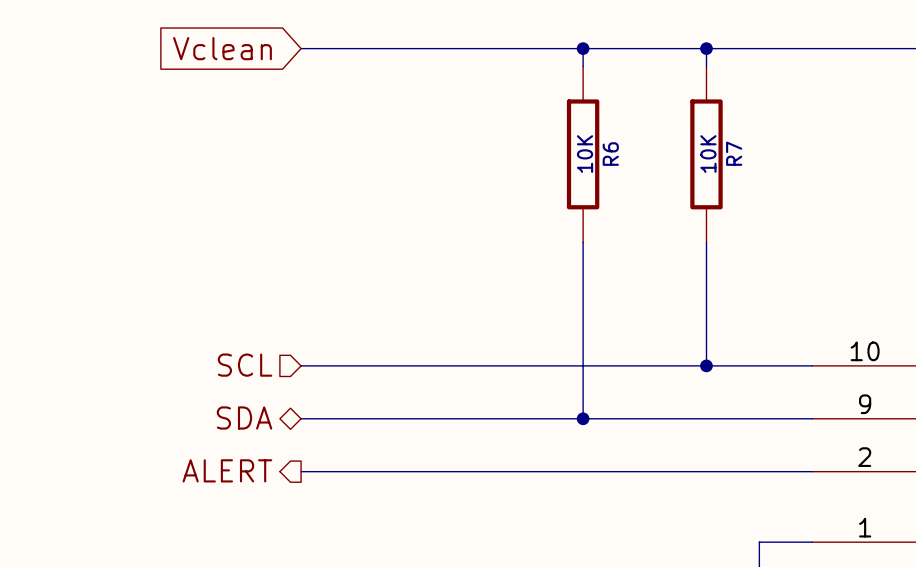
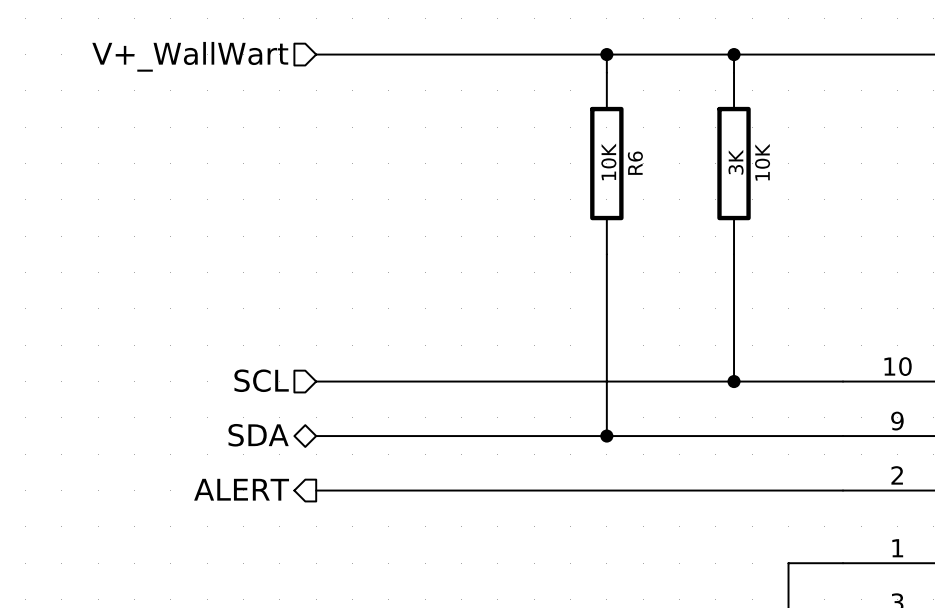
hierarchical label: none -> V+_WallWart (190, 56)
global label: Vclean (222, 48) -> none
R7 name: R7 (734, 153) -> 10K (762, 162)
R7 value: 10K (708, 154) -> 3K (736, 162)

